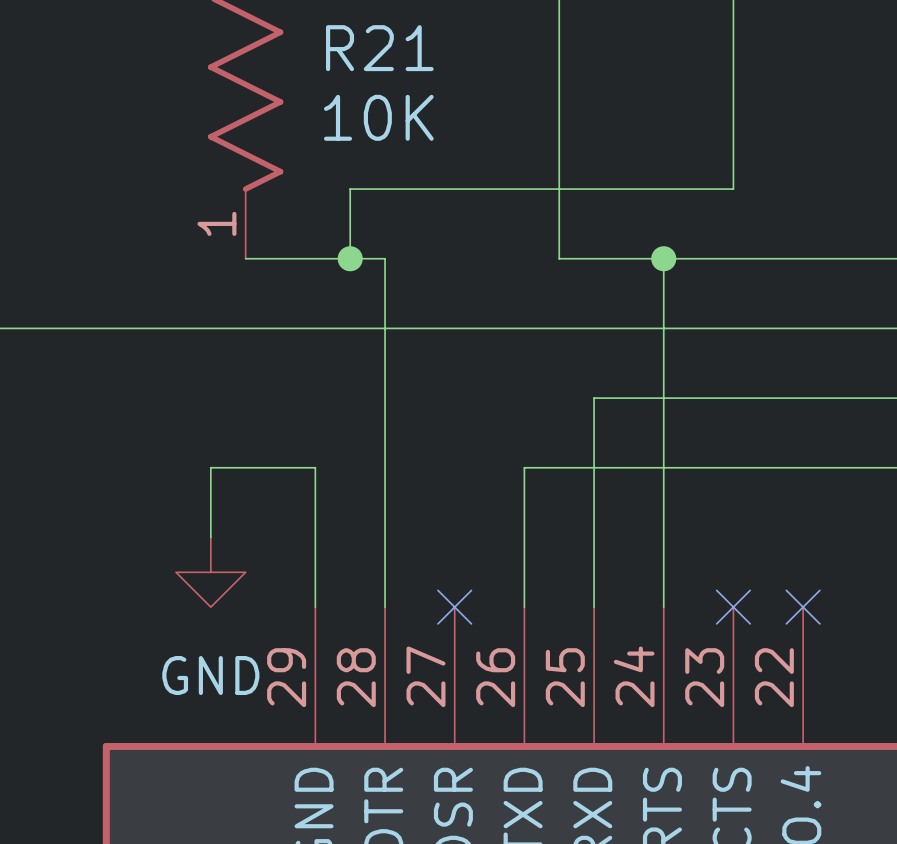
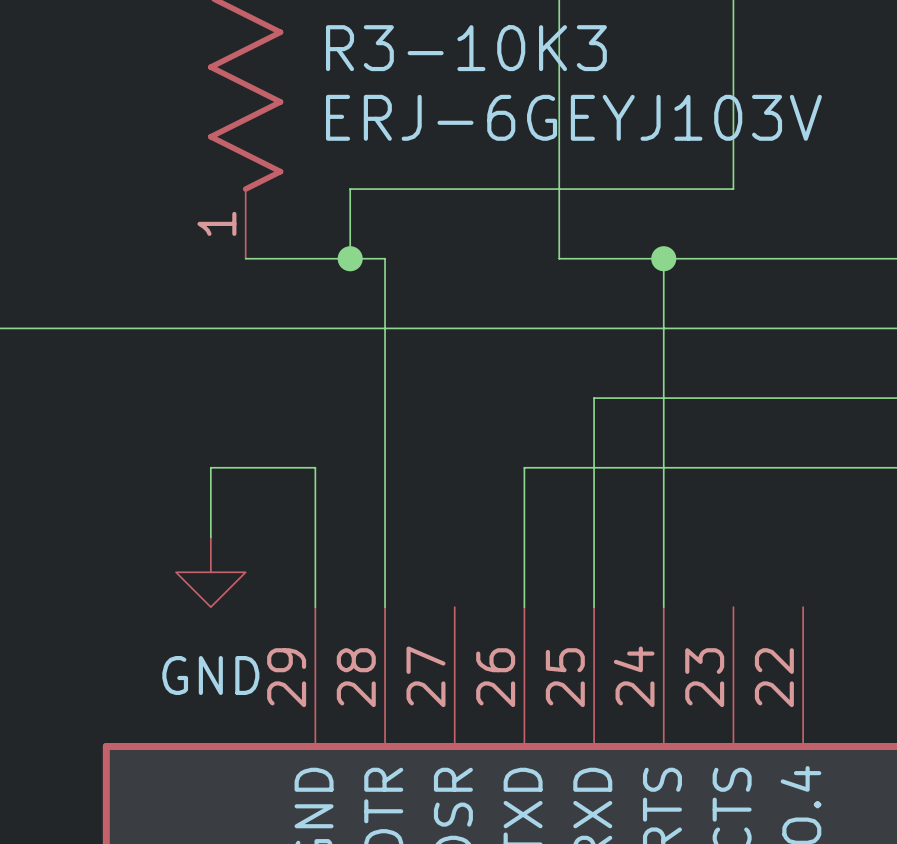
R21 name: R21 (379, 48) -> R3-10K3 (466, 48)
R21 value: 10K (378, 117) -> ERJ-6GEYJ103V (573, 117)
no-connect mark: (454, 607) -> none
no-connect mark: (733, 607) -> none
no-connect mark: (803, 607) -> none

